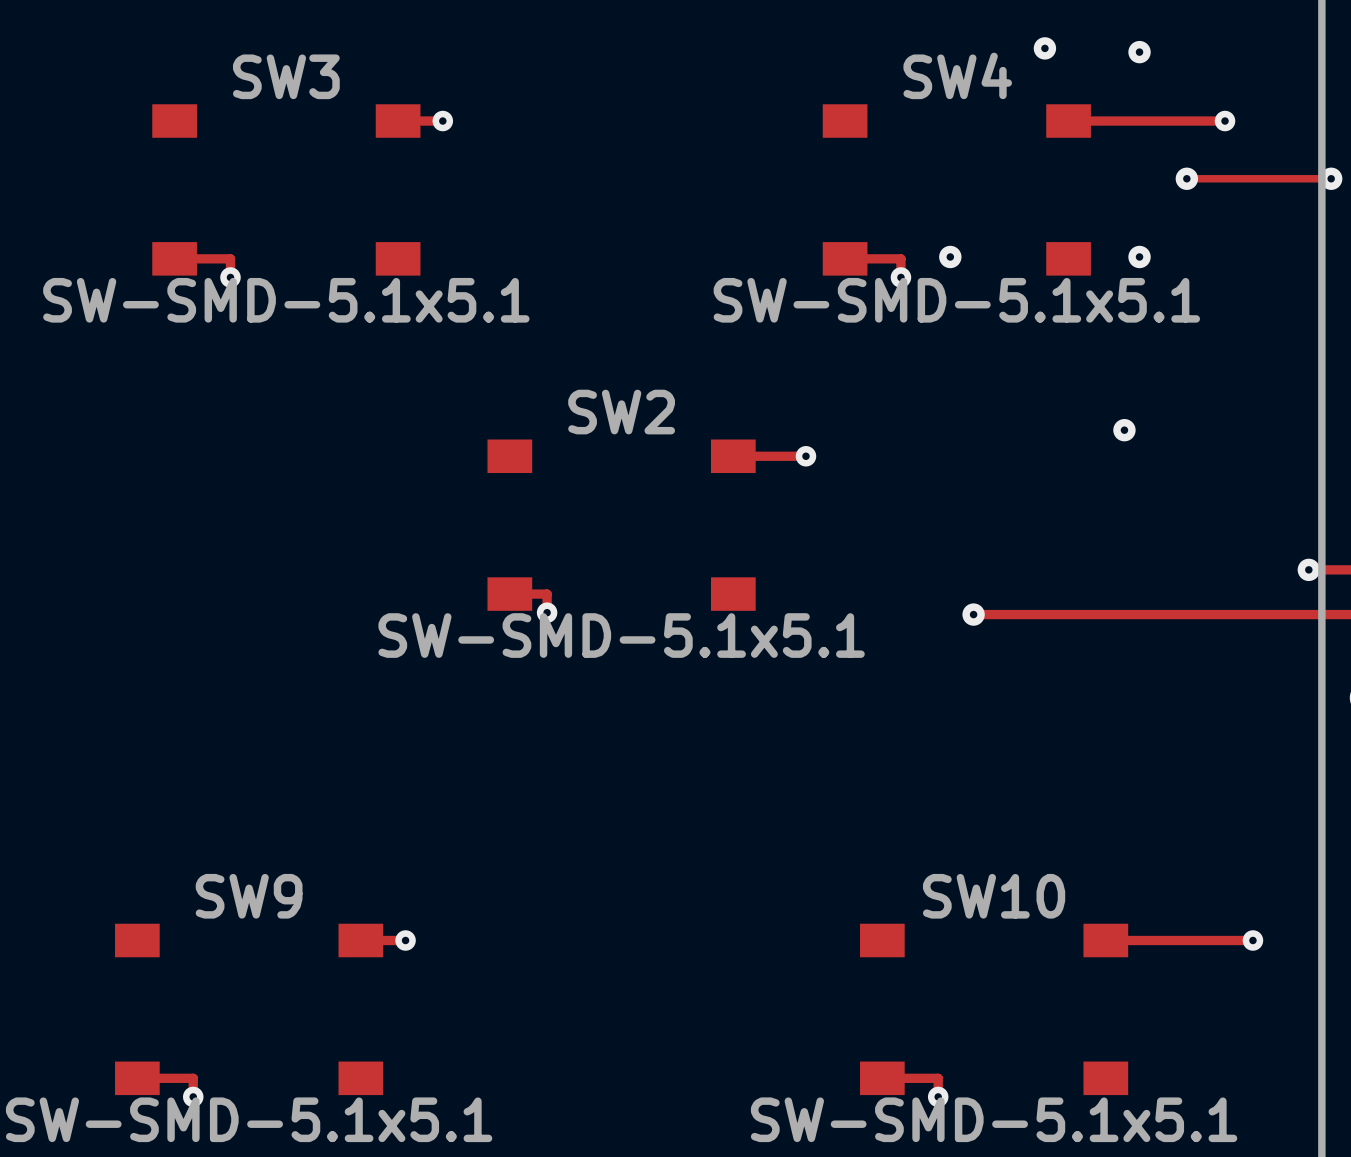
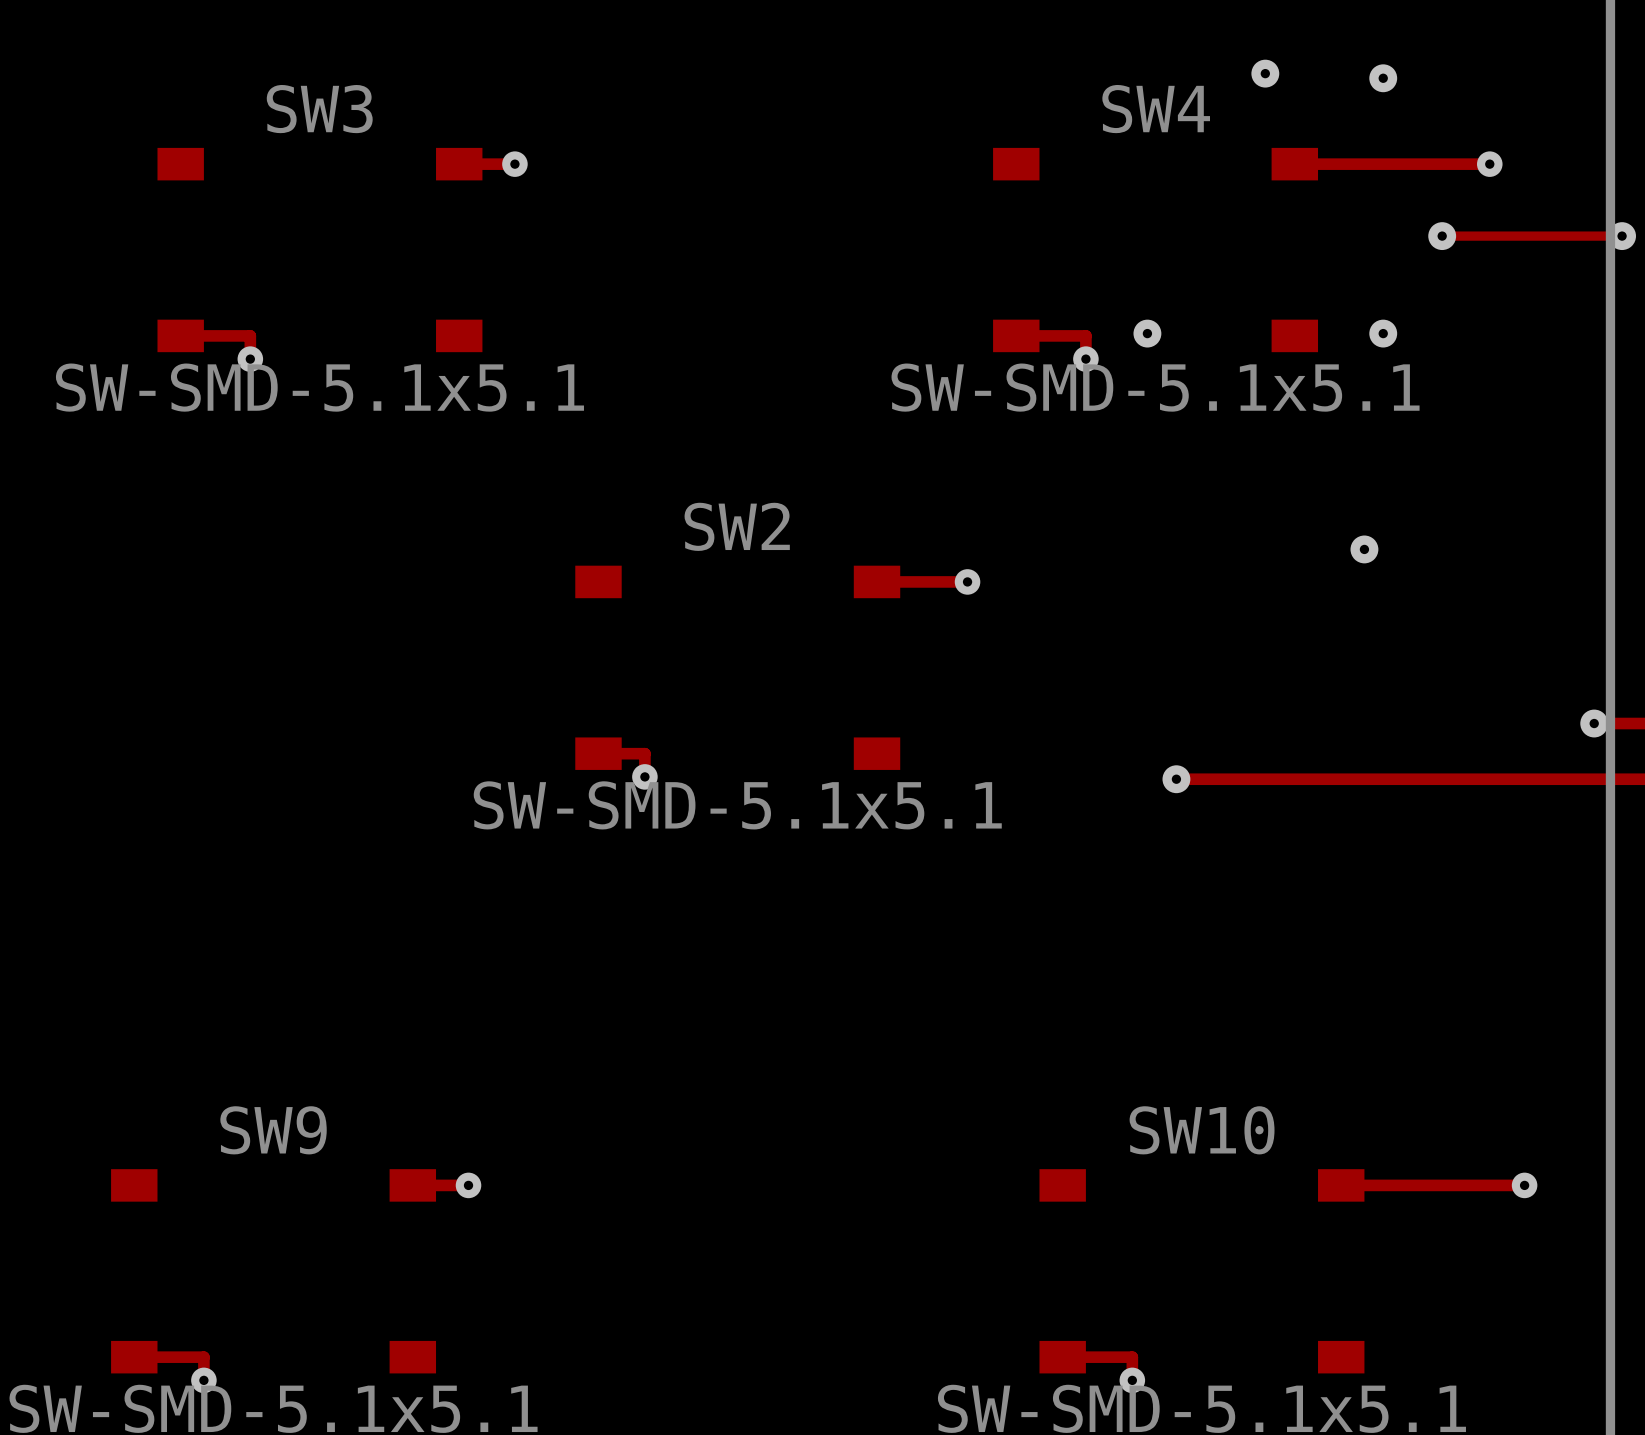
SW3 footprint: [152, 104, 421, 276] -> [157, 147, 483, 353]
SW4 footprint: [822, 104, 1091, 276] -> [993, 147, 1319, 353]
SW2 footprint: [487, 439, 756, 611] -> [575, 565, 901, 770]
SW9 footprint: [115, 923, 384, 1096] -> [111, 1169, 437, 1374]
SW10 footprint: [859, 923, 1129, 1096] -> [1039, 1169, 1365, 1374]

